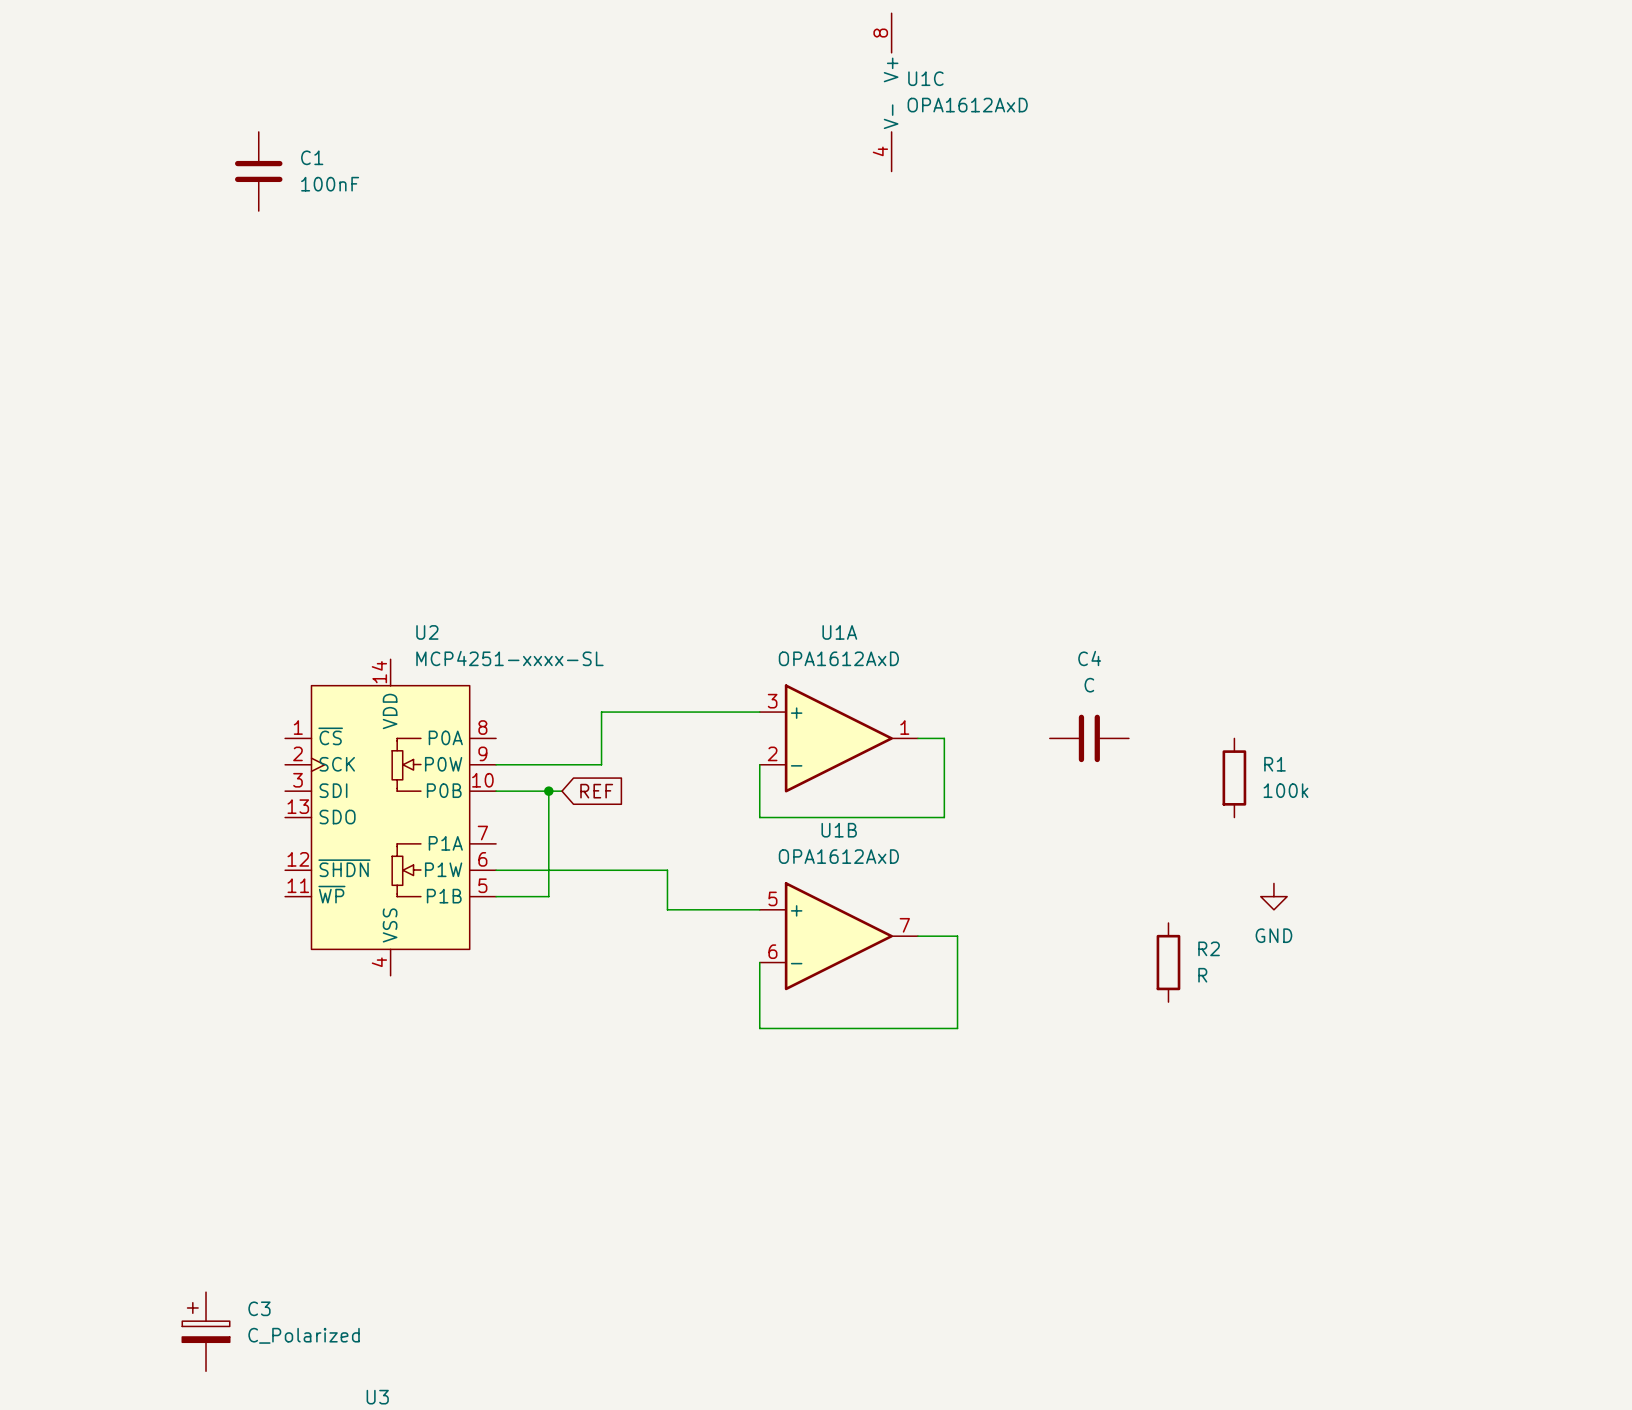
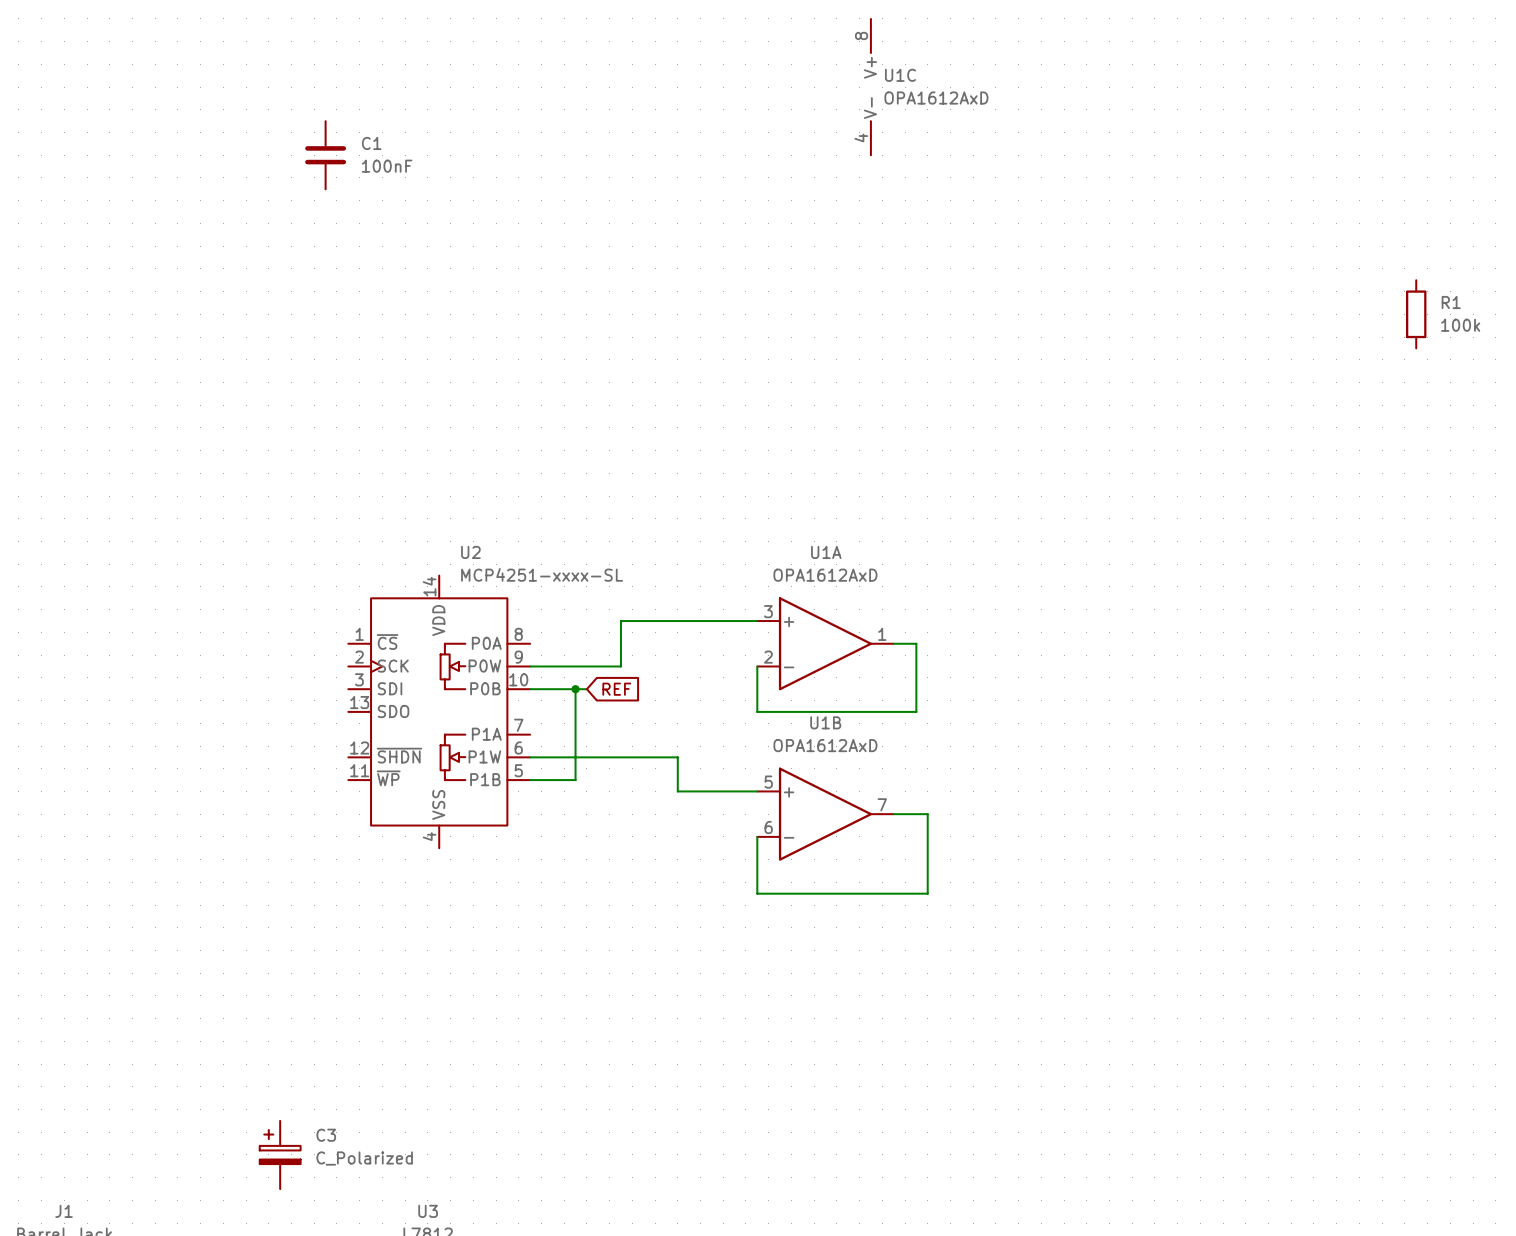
C4: C (1089, 738) -> none
R1 position: (1234, 777) -> (1416, 314)
power symbol: GND (1273, 896) -> none
R2: R (1168, 962) -> none

